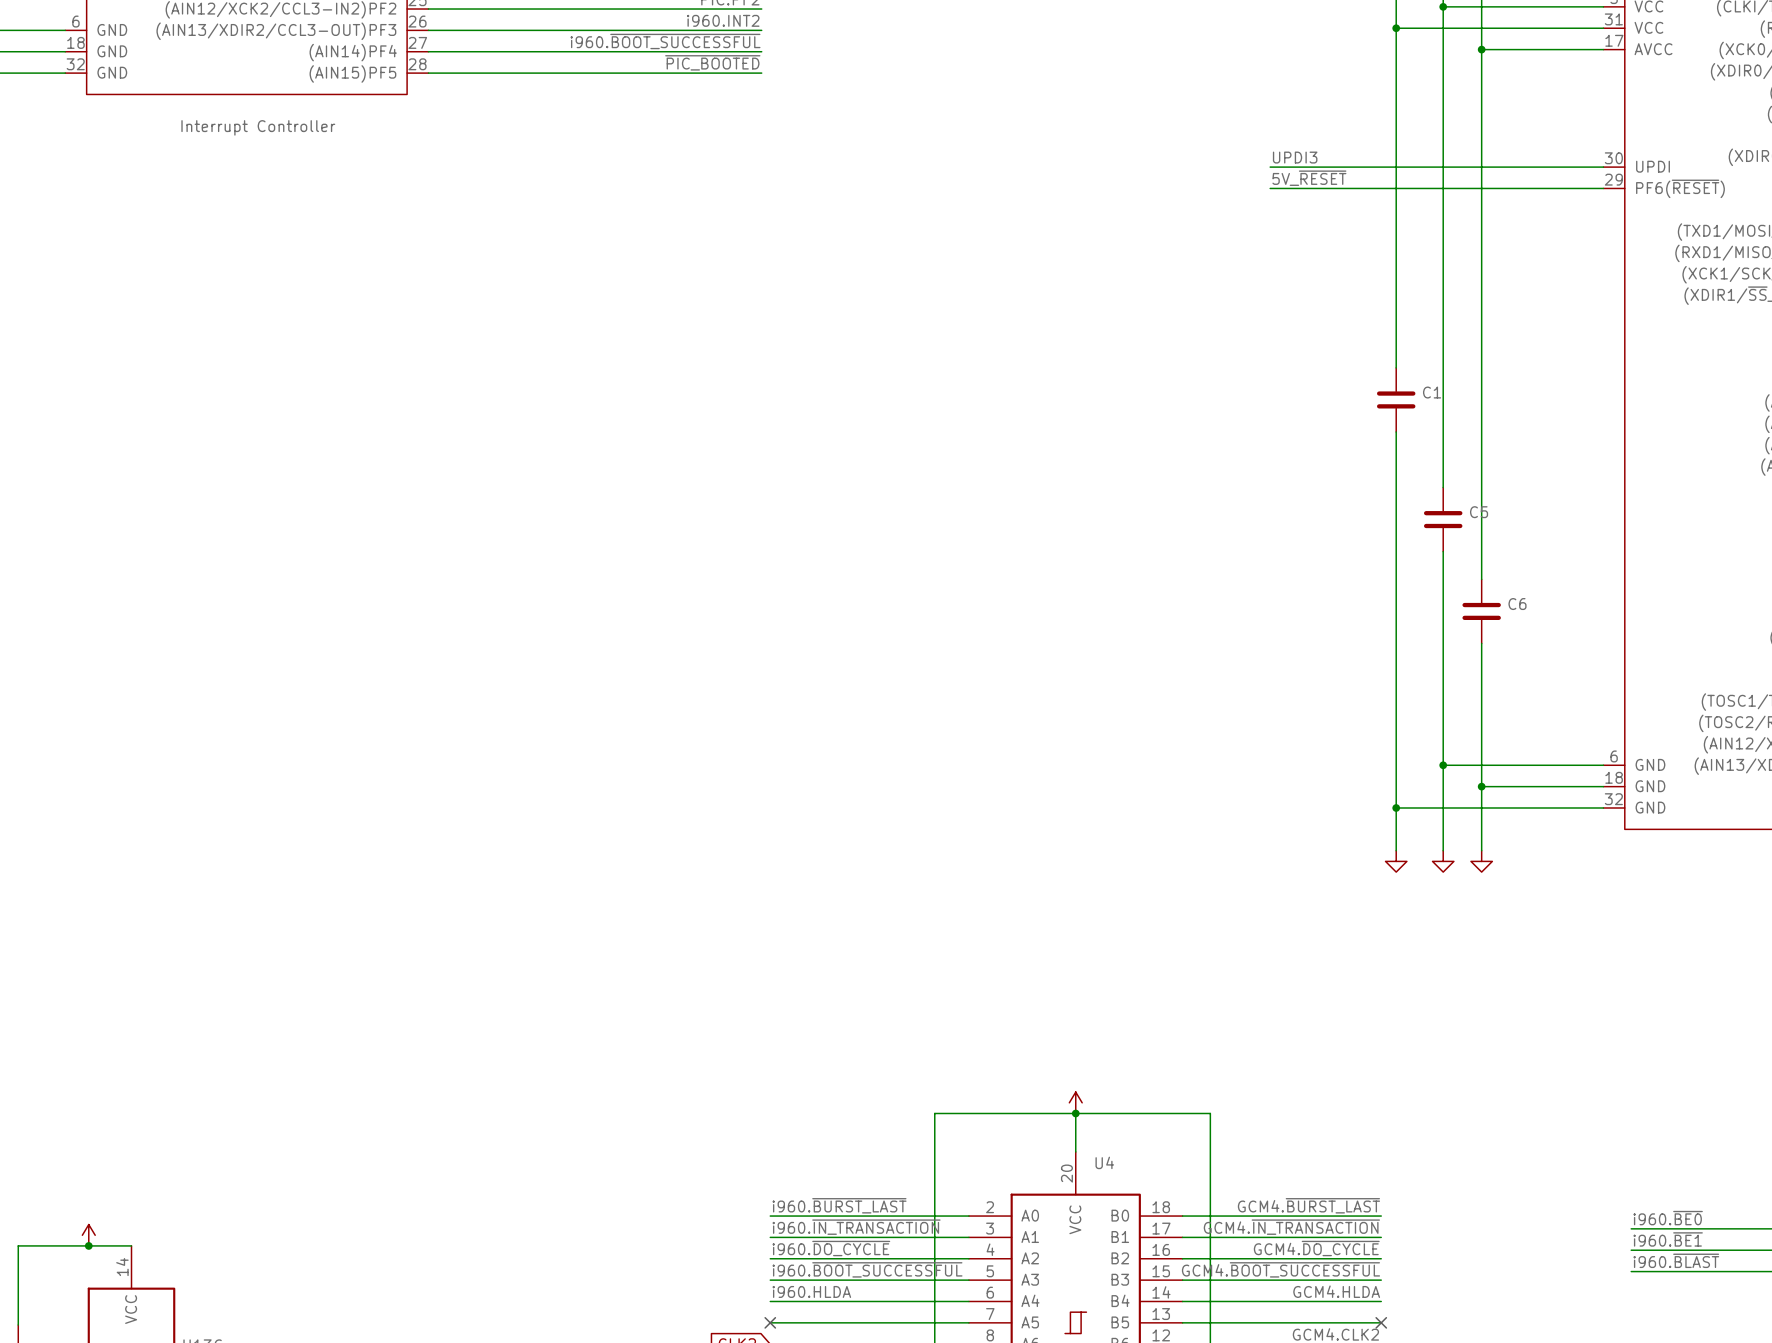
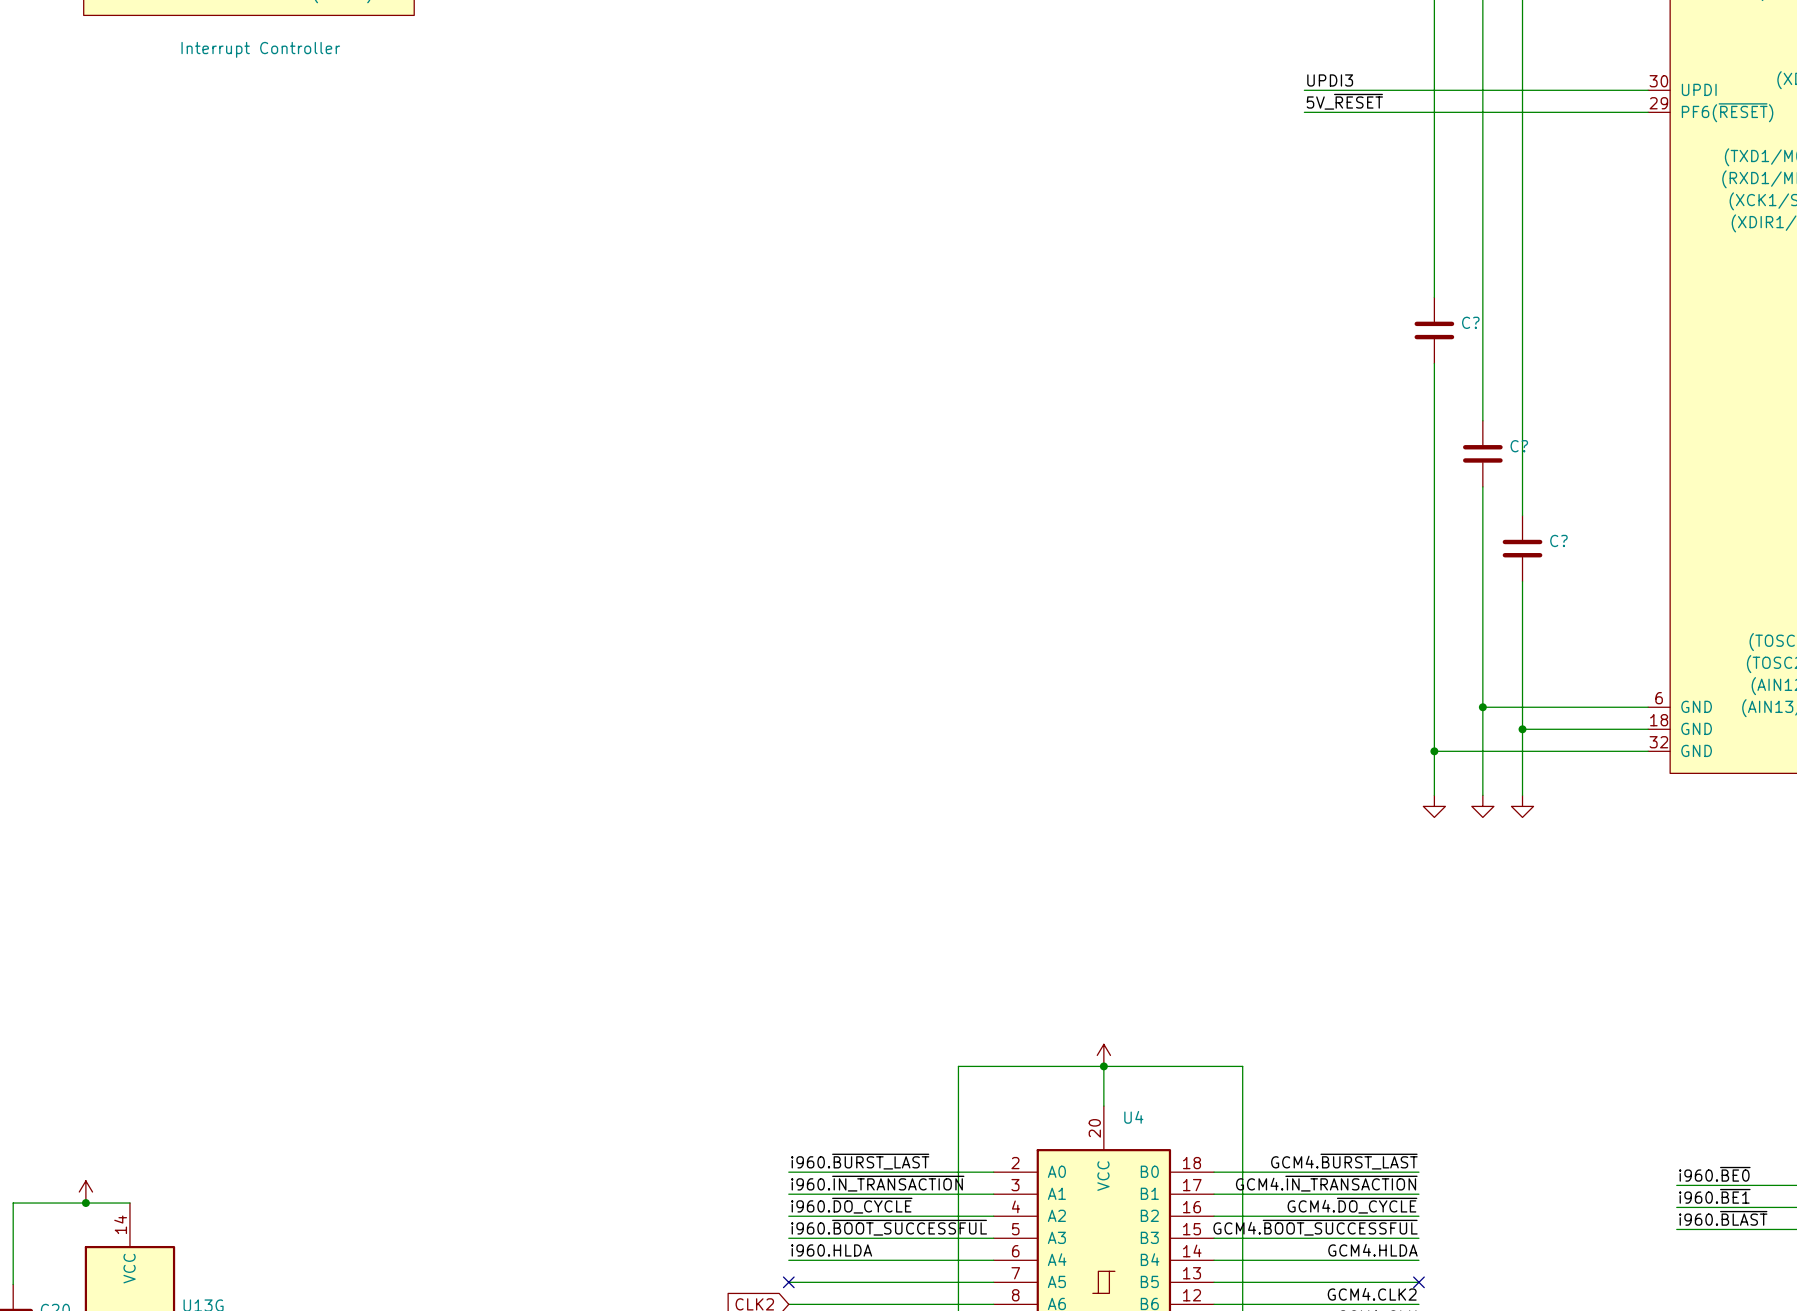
C1 name: C1 (1432, 392) -> C? (1470, 322)
C5 name: C5 (1479, 512) -> C? (1519, 446)
C6 name: C6 (1517, 604) -> C? (1558, 540)

